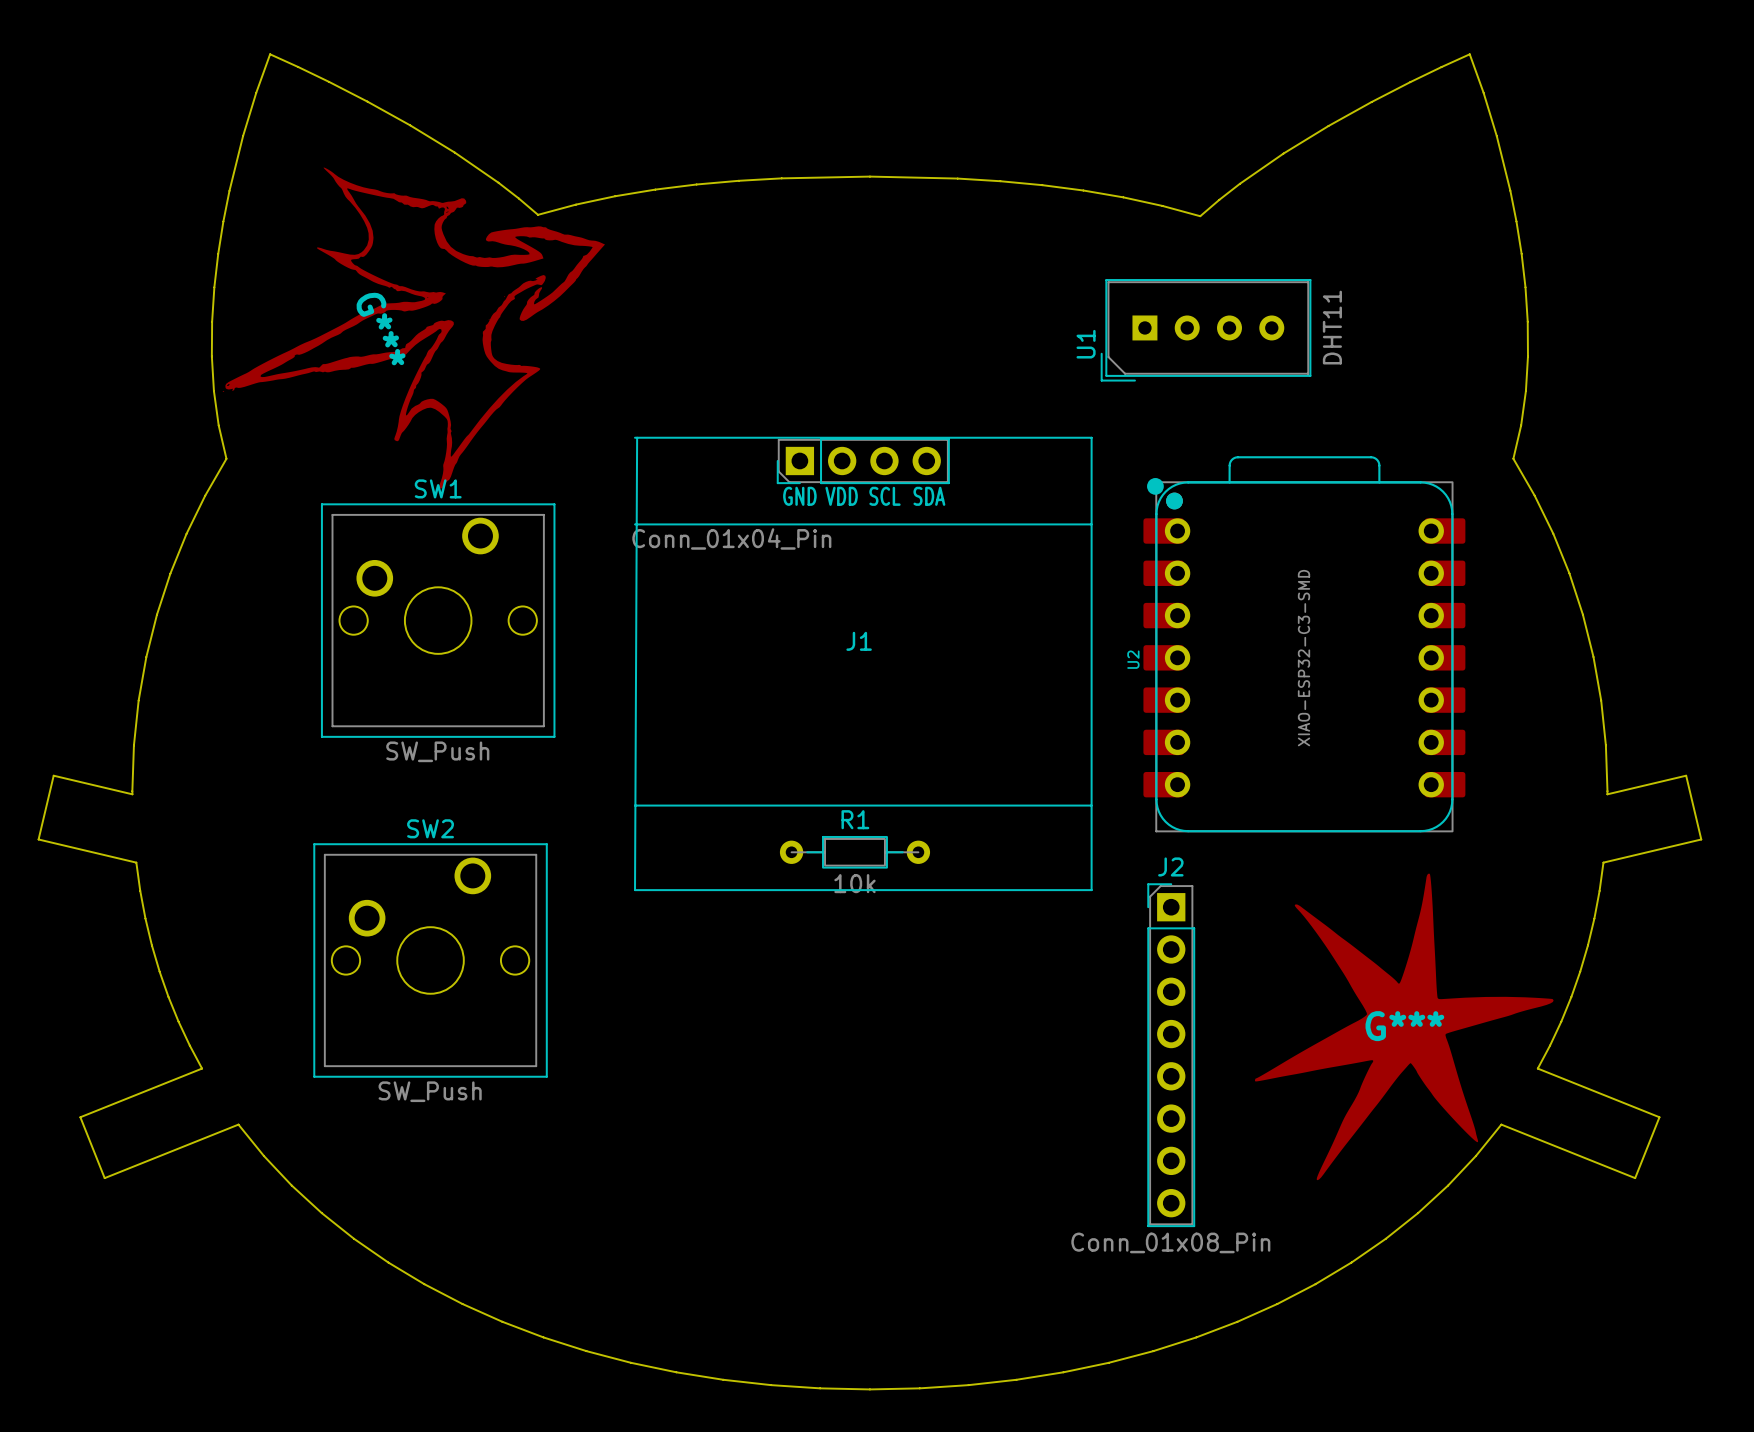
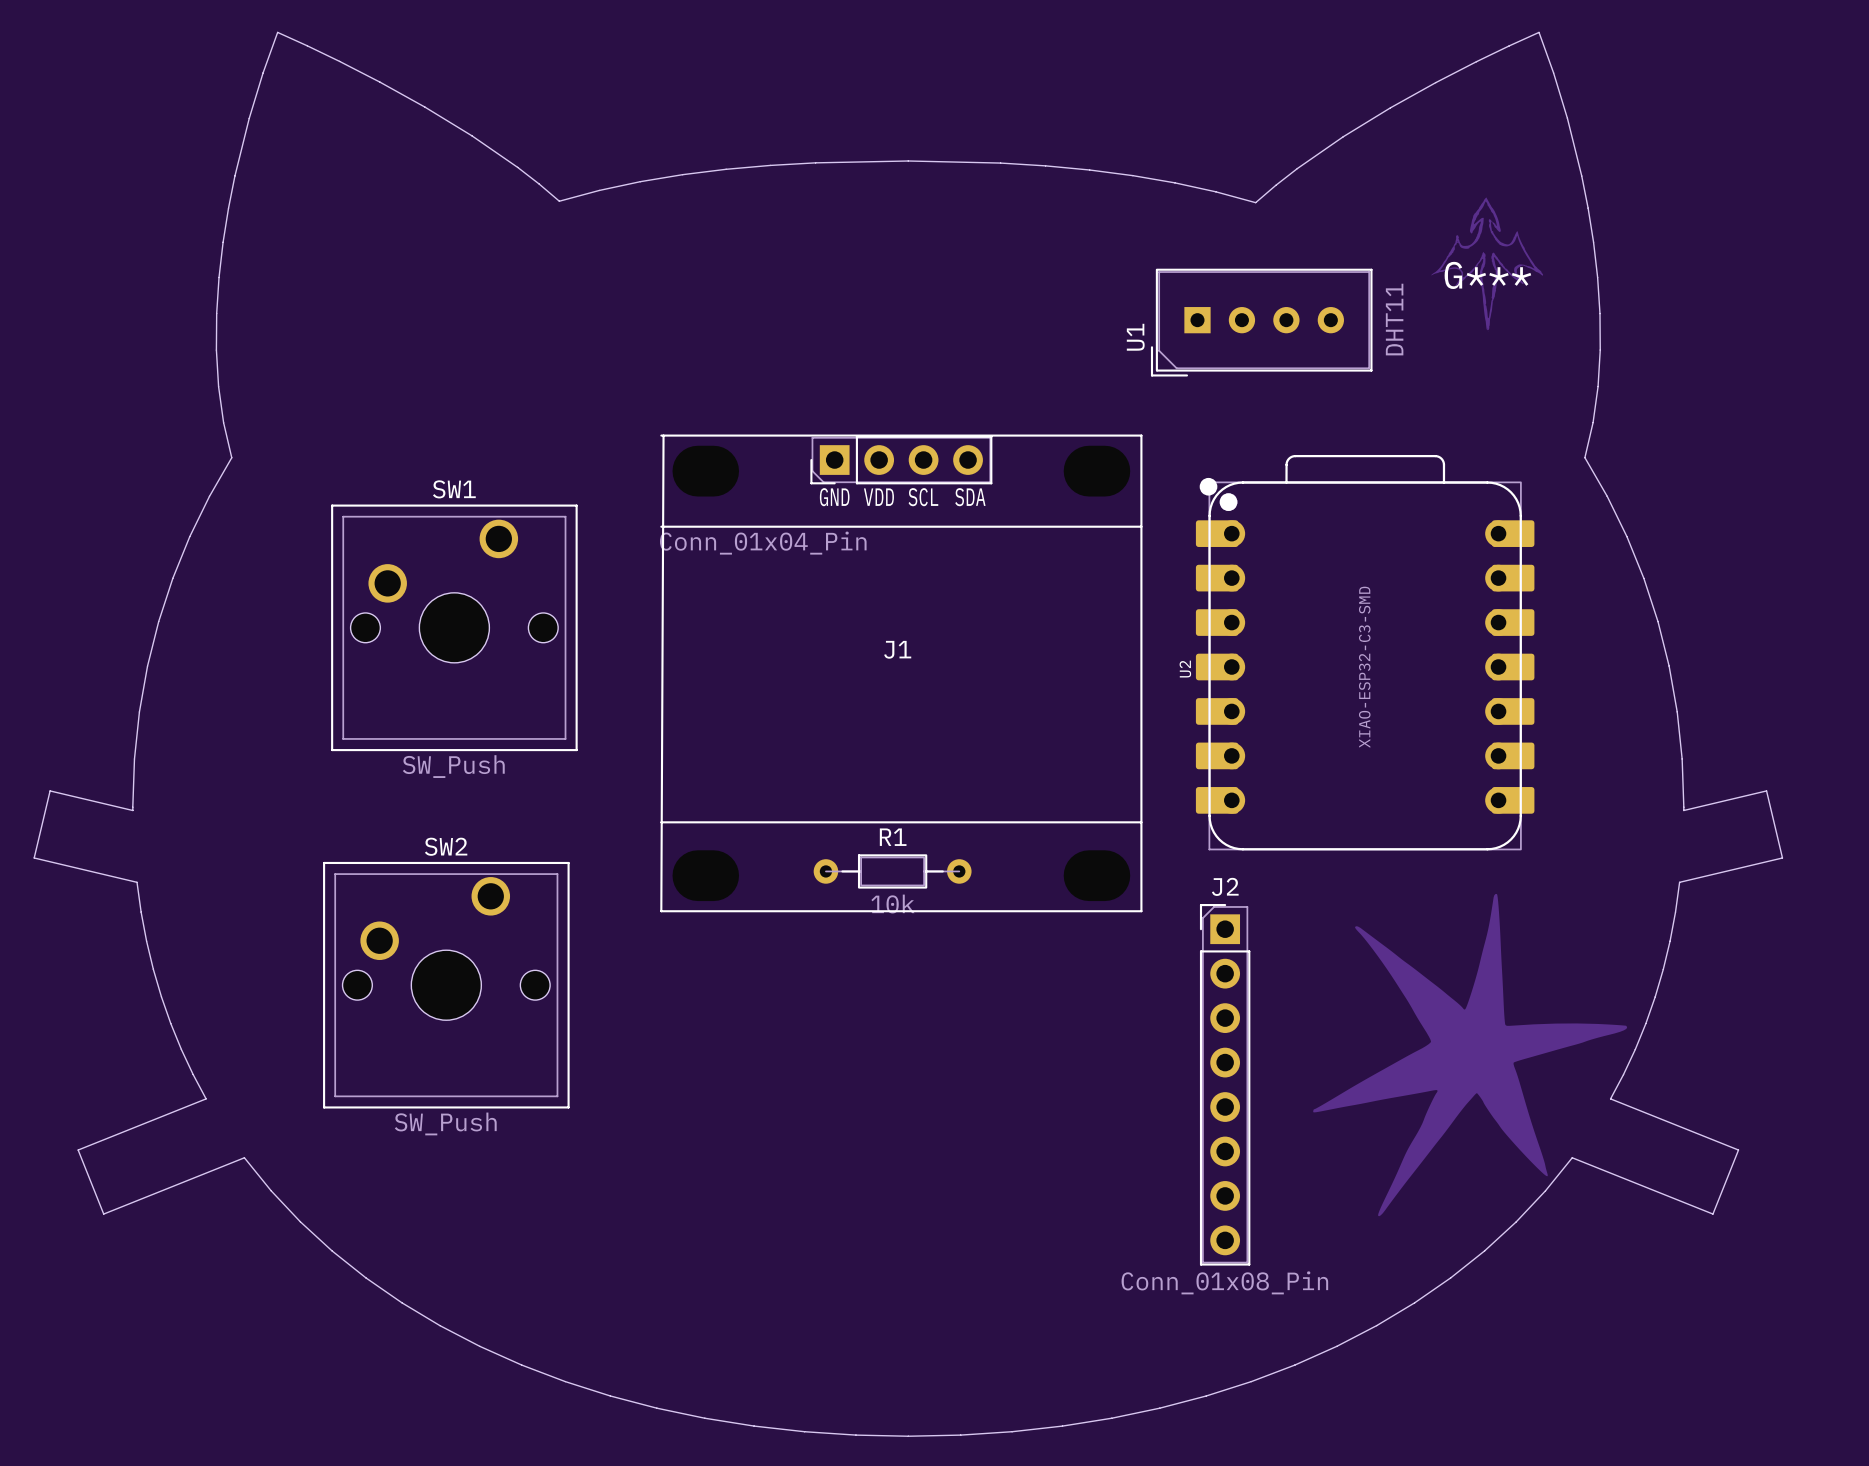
G***: none -> (1487, 264)
G***: (413, 327) -> none
drawing: none -> [1313, 894, 1628, 1217]
G***: (1404, 1026) -> none

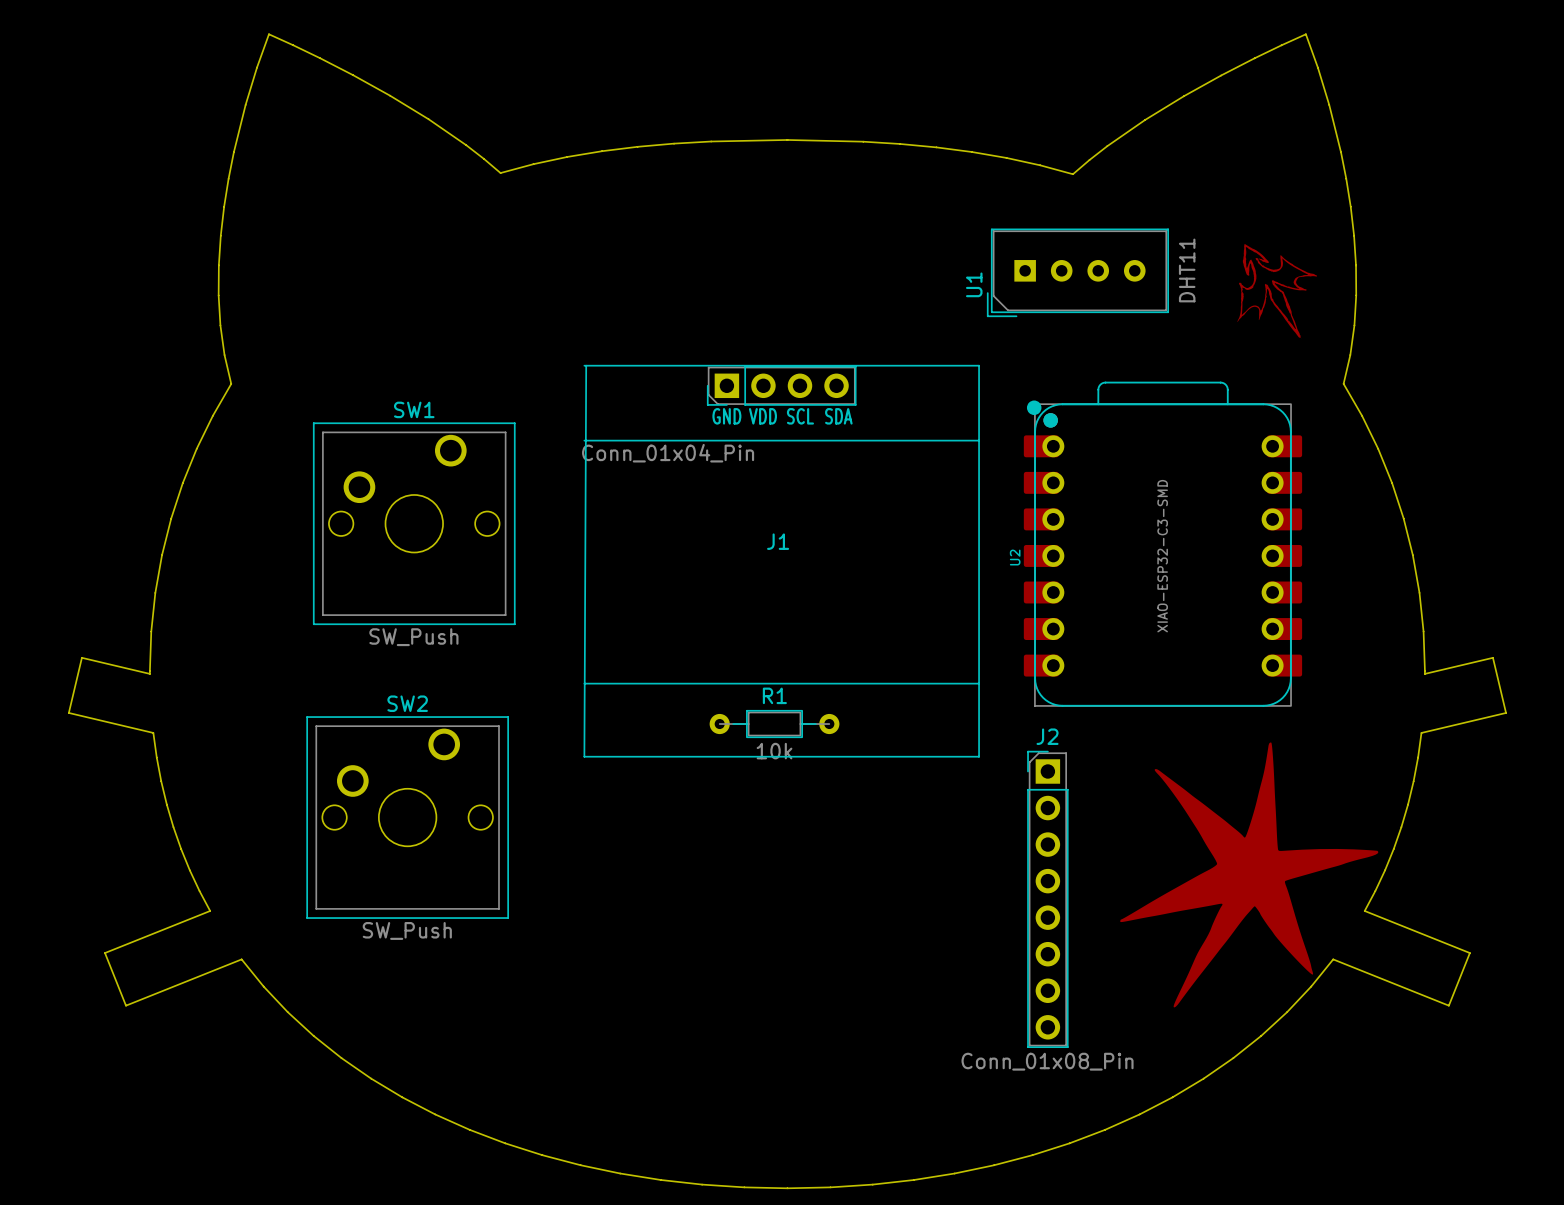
G***: (1487, 264) -> none
drawing: none -> [1237, 243, 1318, 339]

